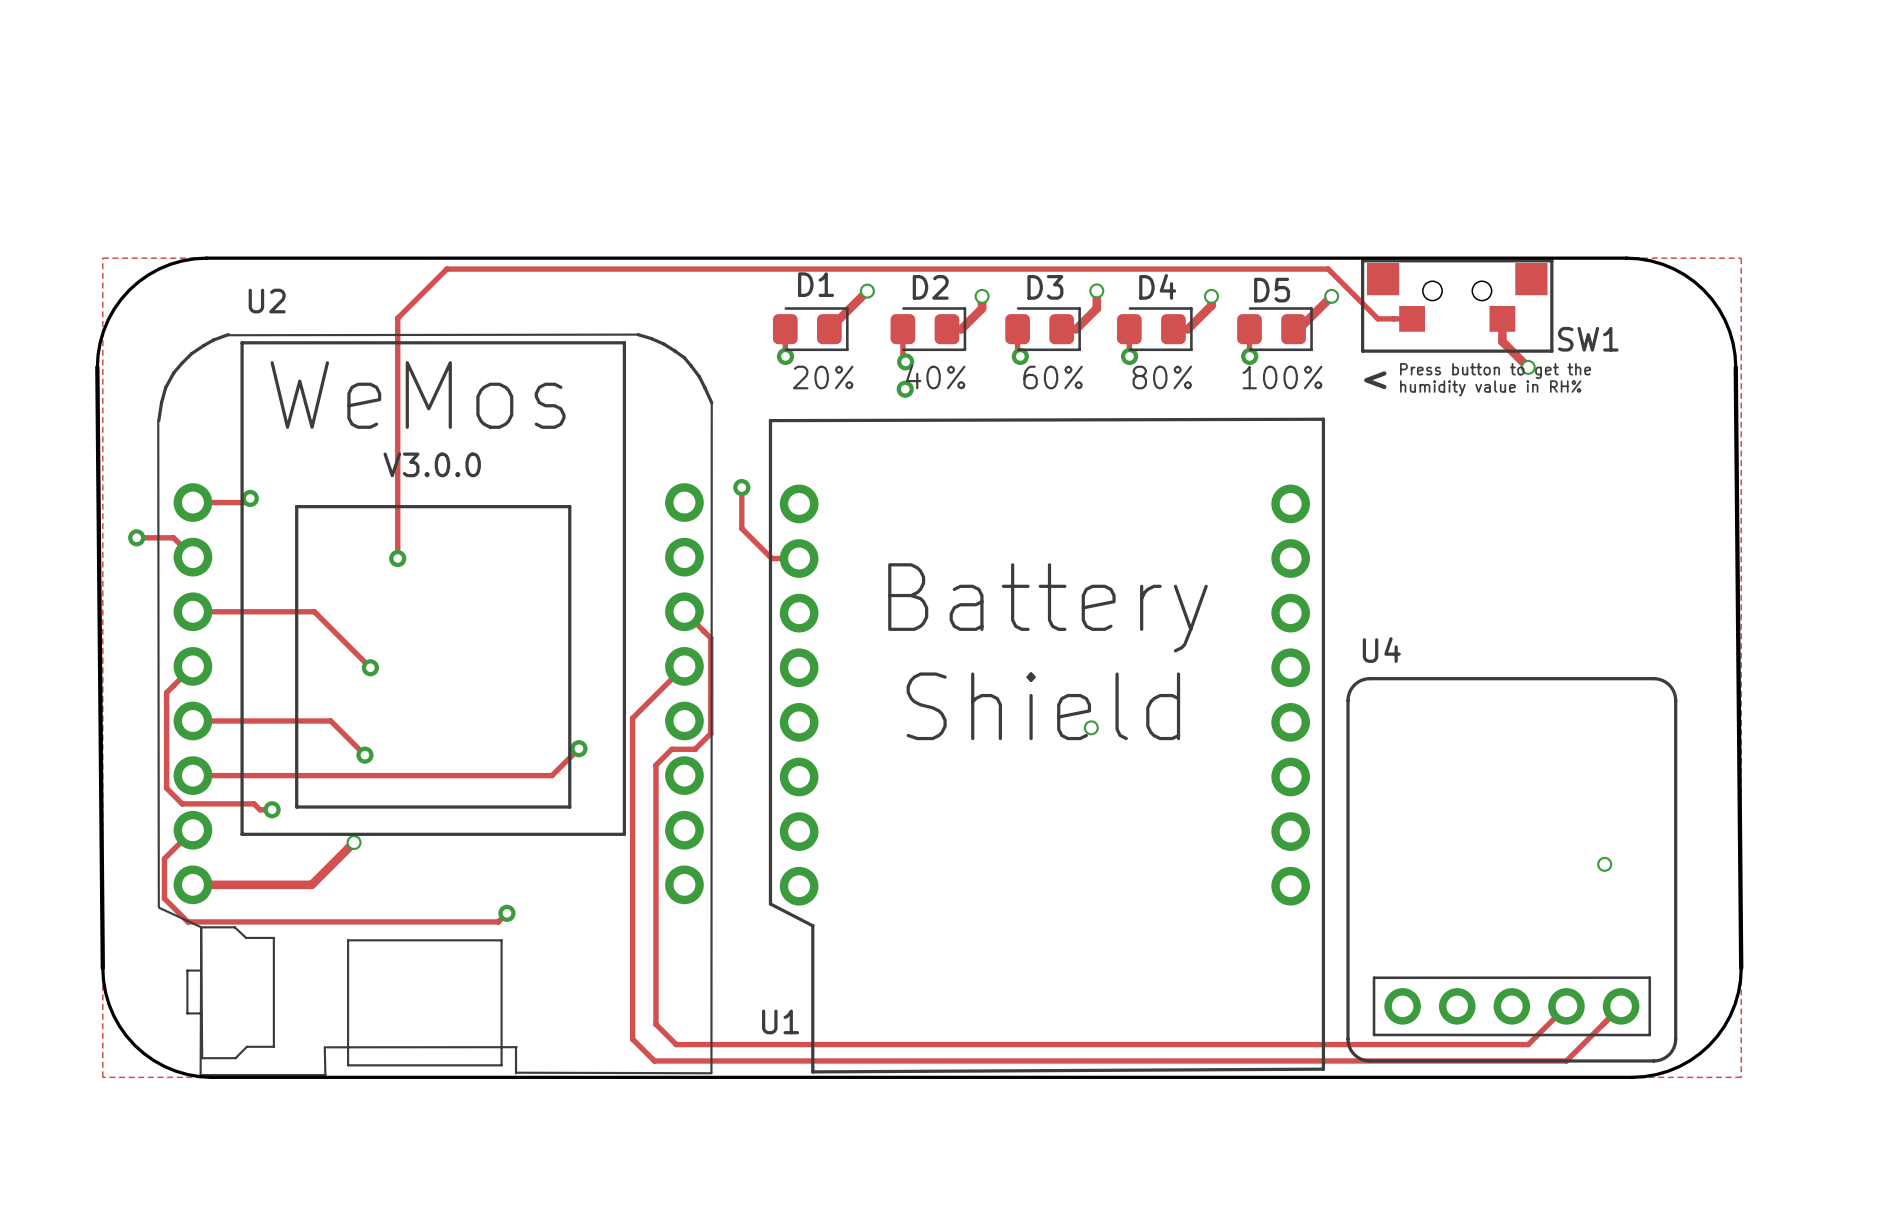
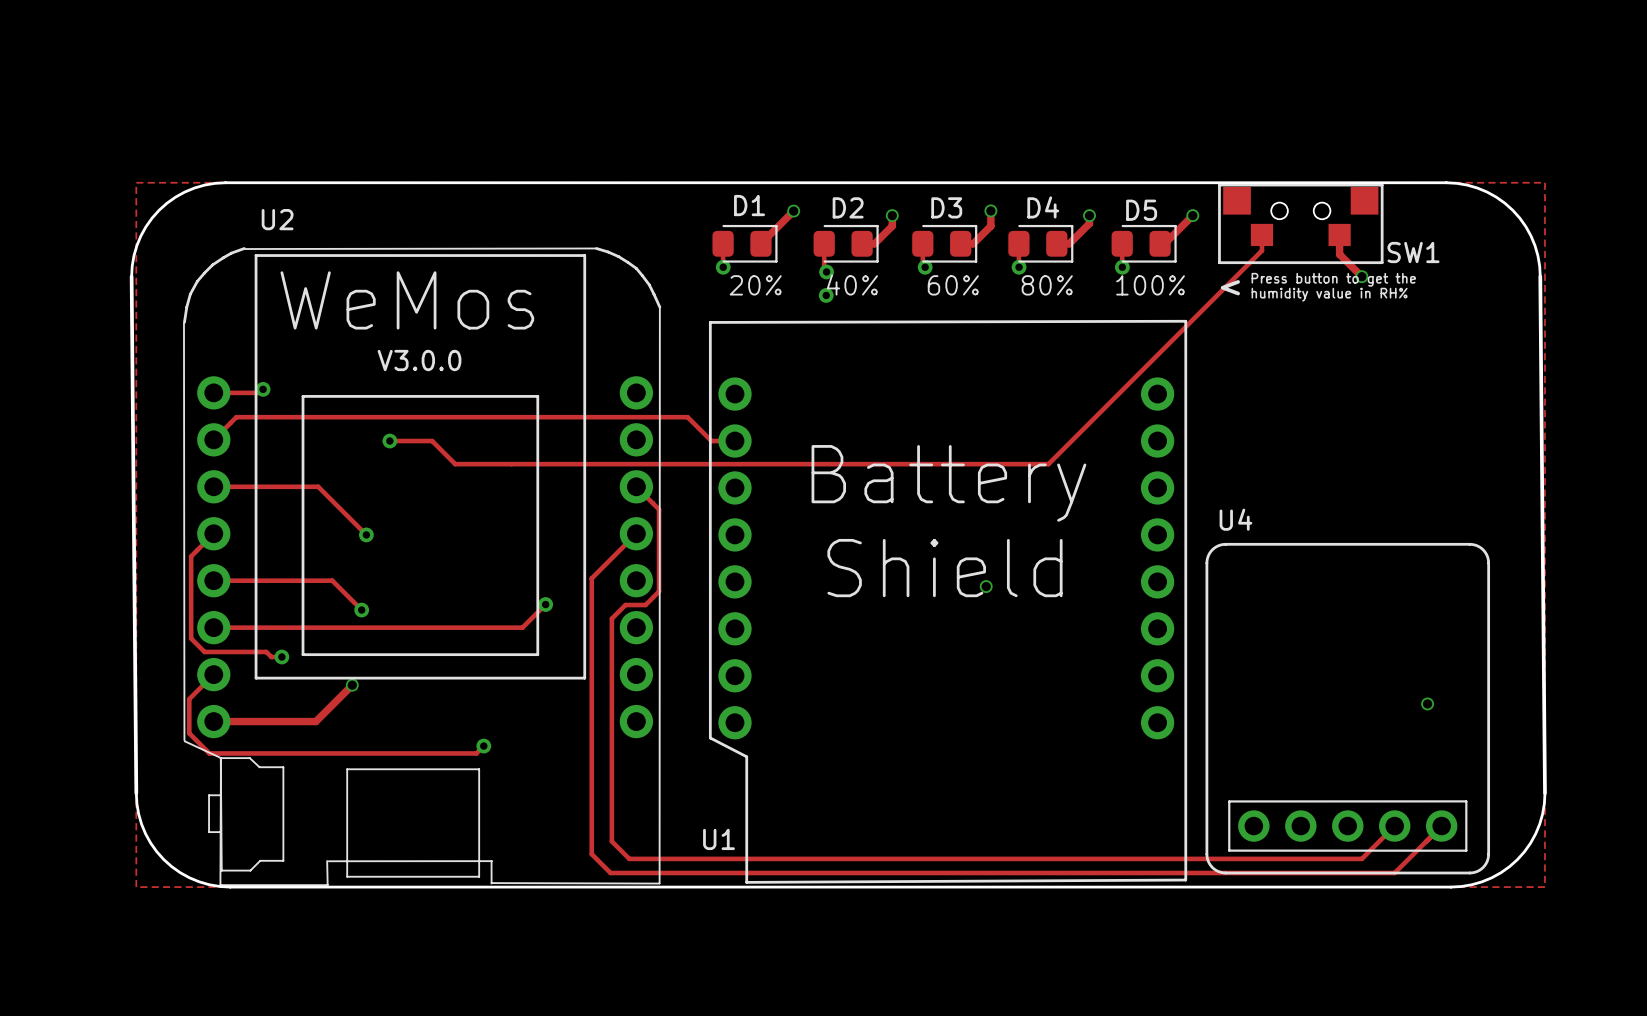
track: (1412, 318) (1378, 318) (1328, 269) (446, 269) (397, 318) (397, 558) -> (1261, 234) (1261, 250) (1048, 464) (455, 464) (432, 441) (389, 441)
track: (741, 487) (741, 528) (744, 530) -> (213, 439) (236, 417) (687, 417)
via: (741, 487) -> none
track: (136, 537) (173, 537) (192, 557) -> none
via: (136, 537) -> none

